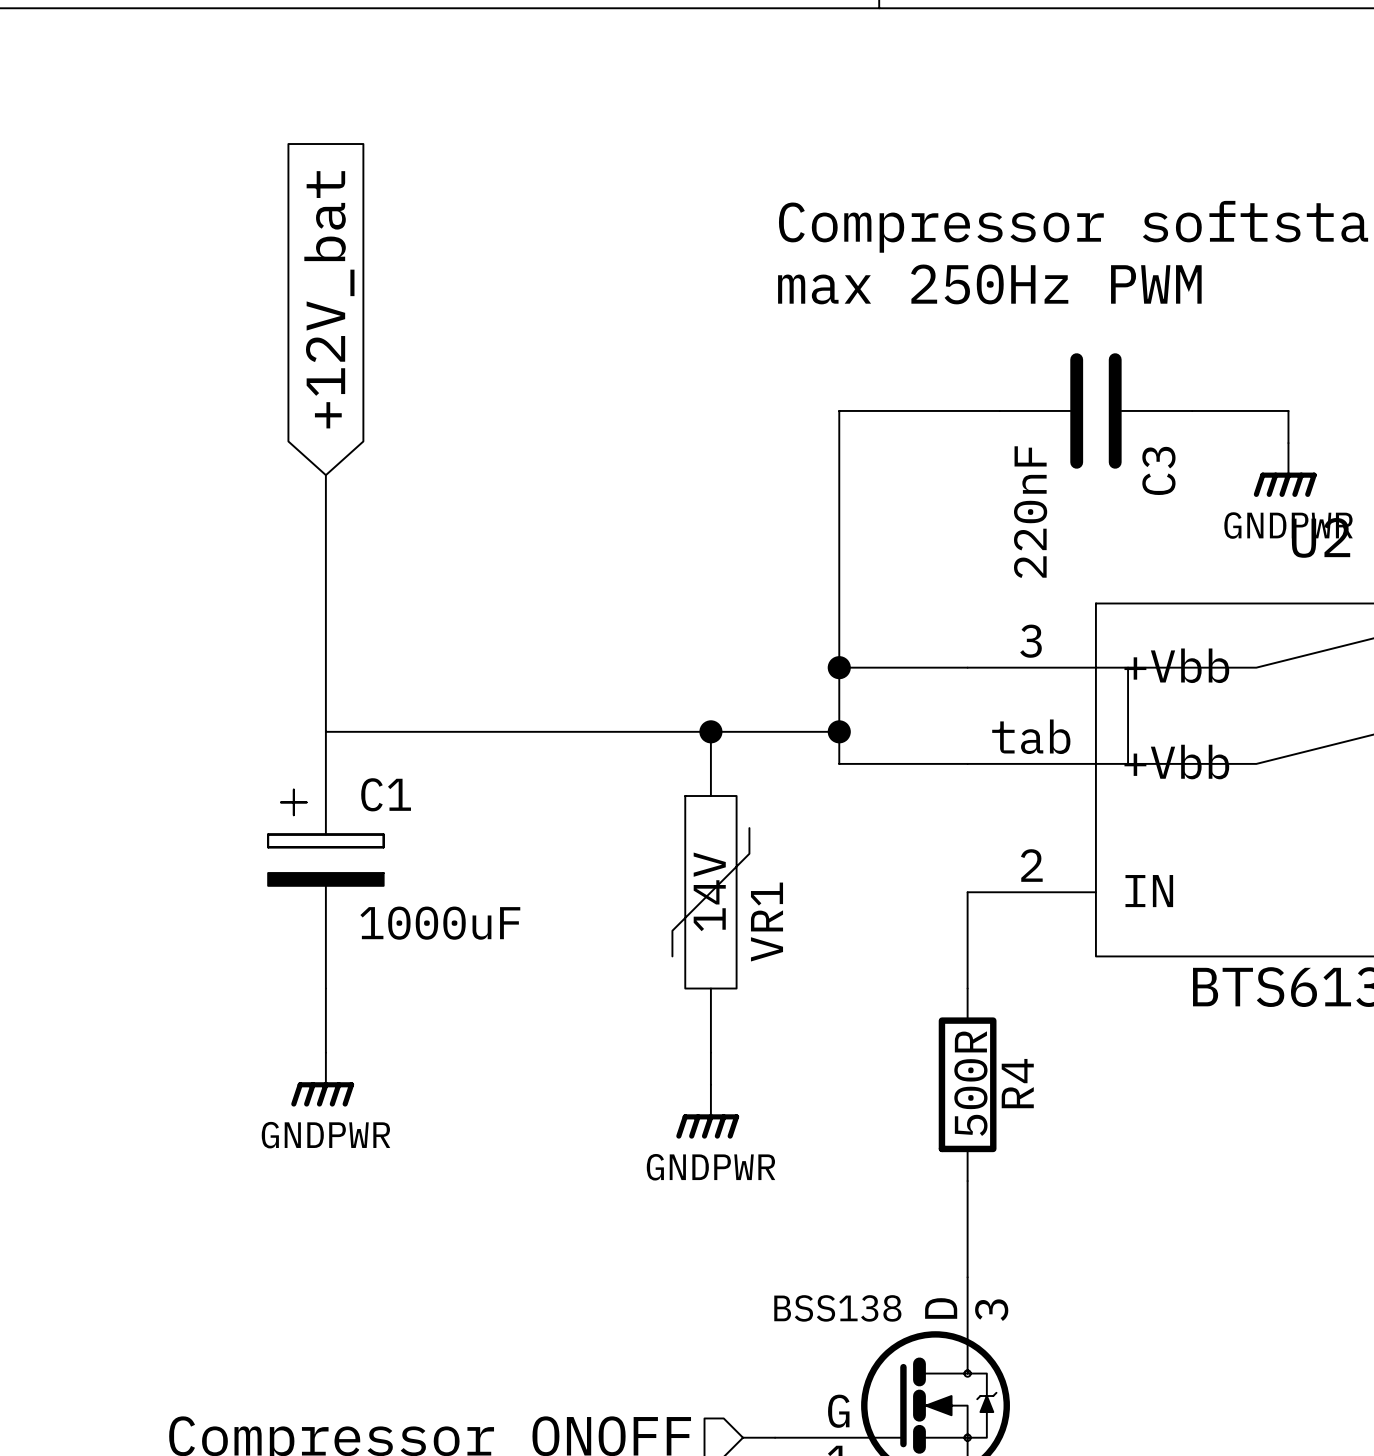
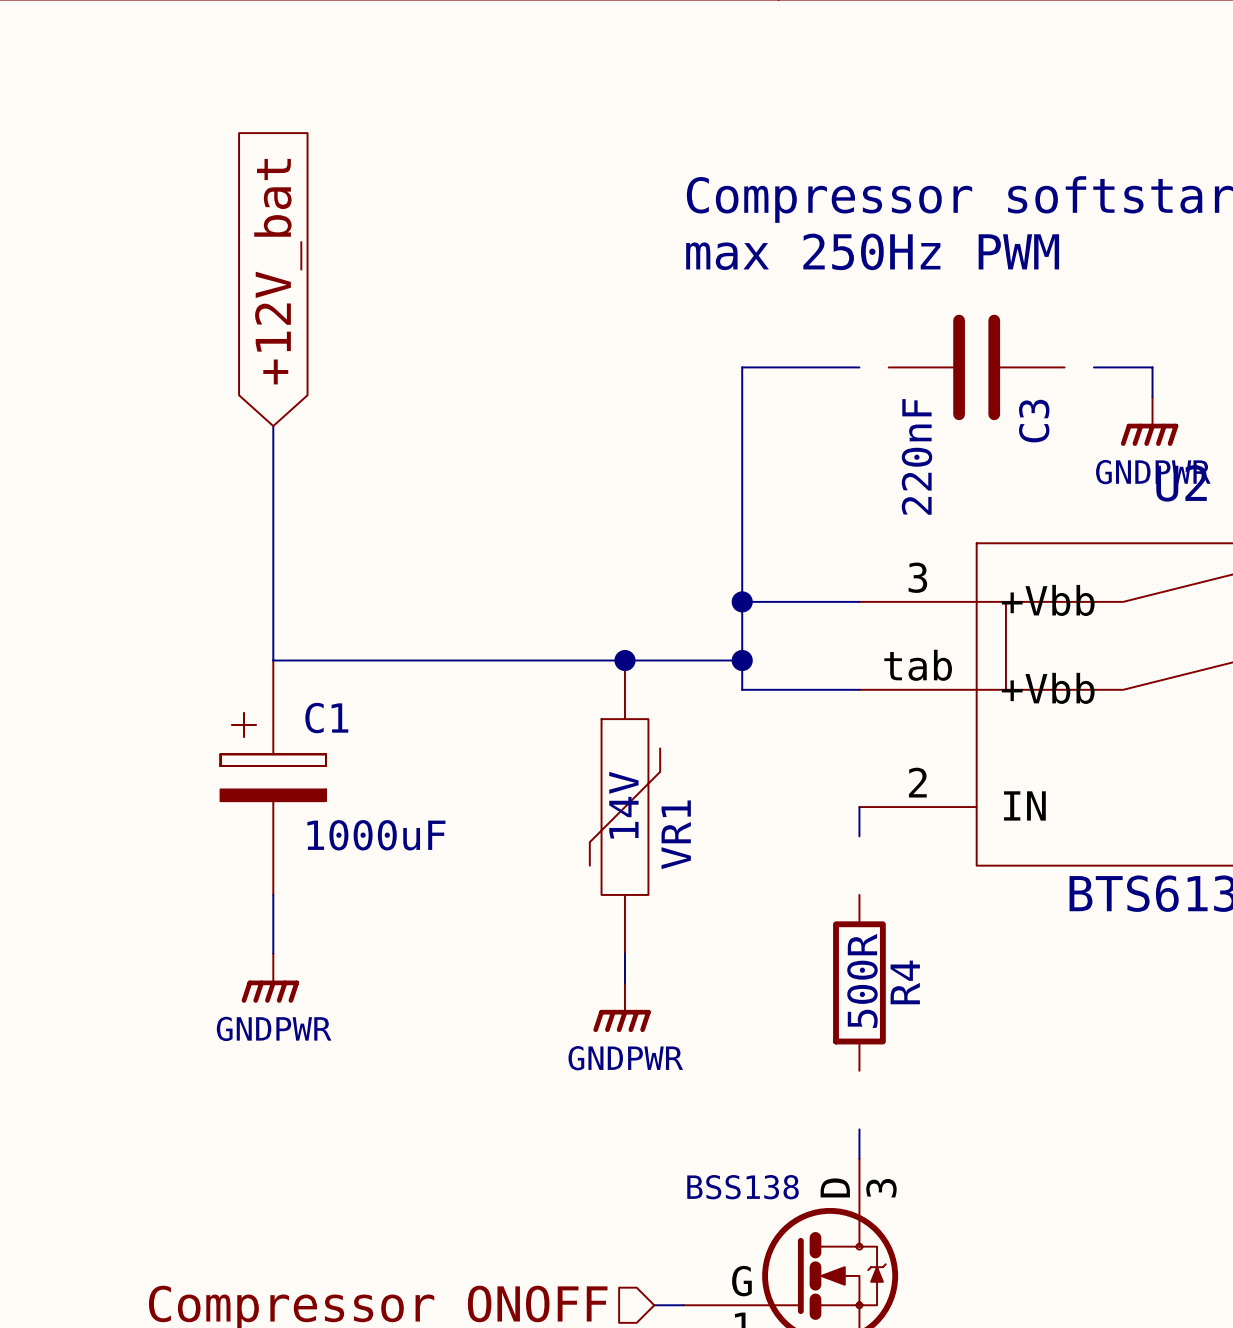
wire: (967, 410) (999, 410) -> none
wire: (1192, 410) (1224, 410) -> none
wire: (967, 924) (967, 988) -> none
wire: (967, 1181) (967, 1245) -> none

